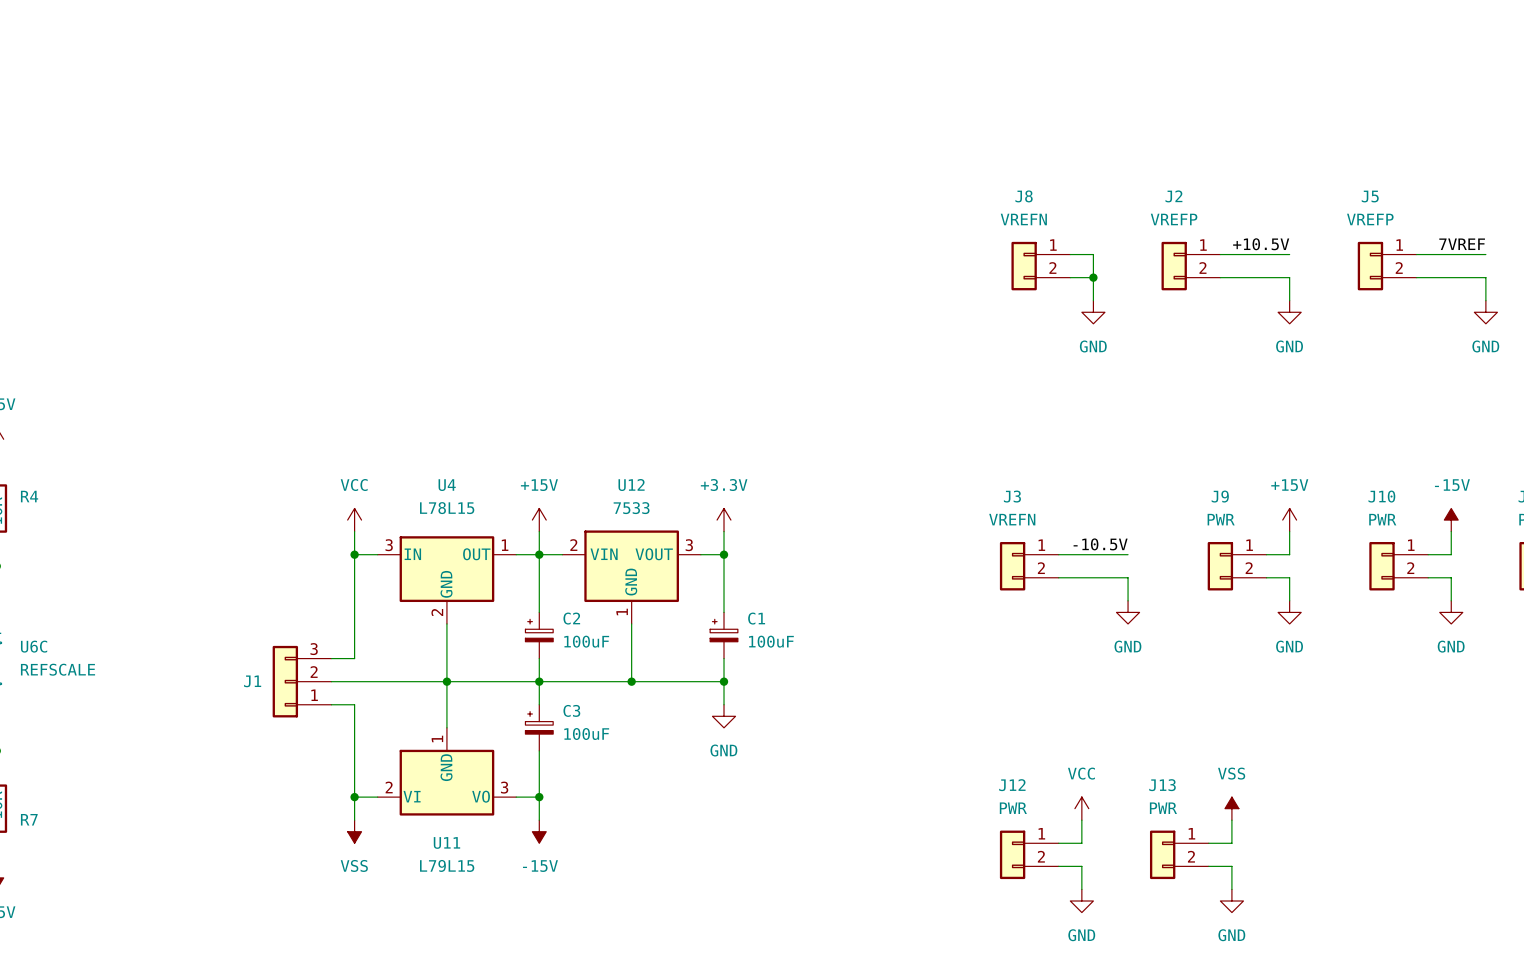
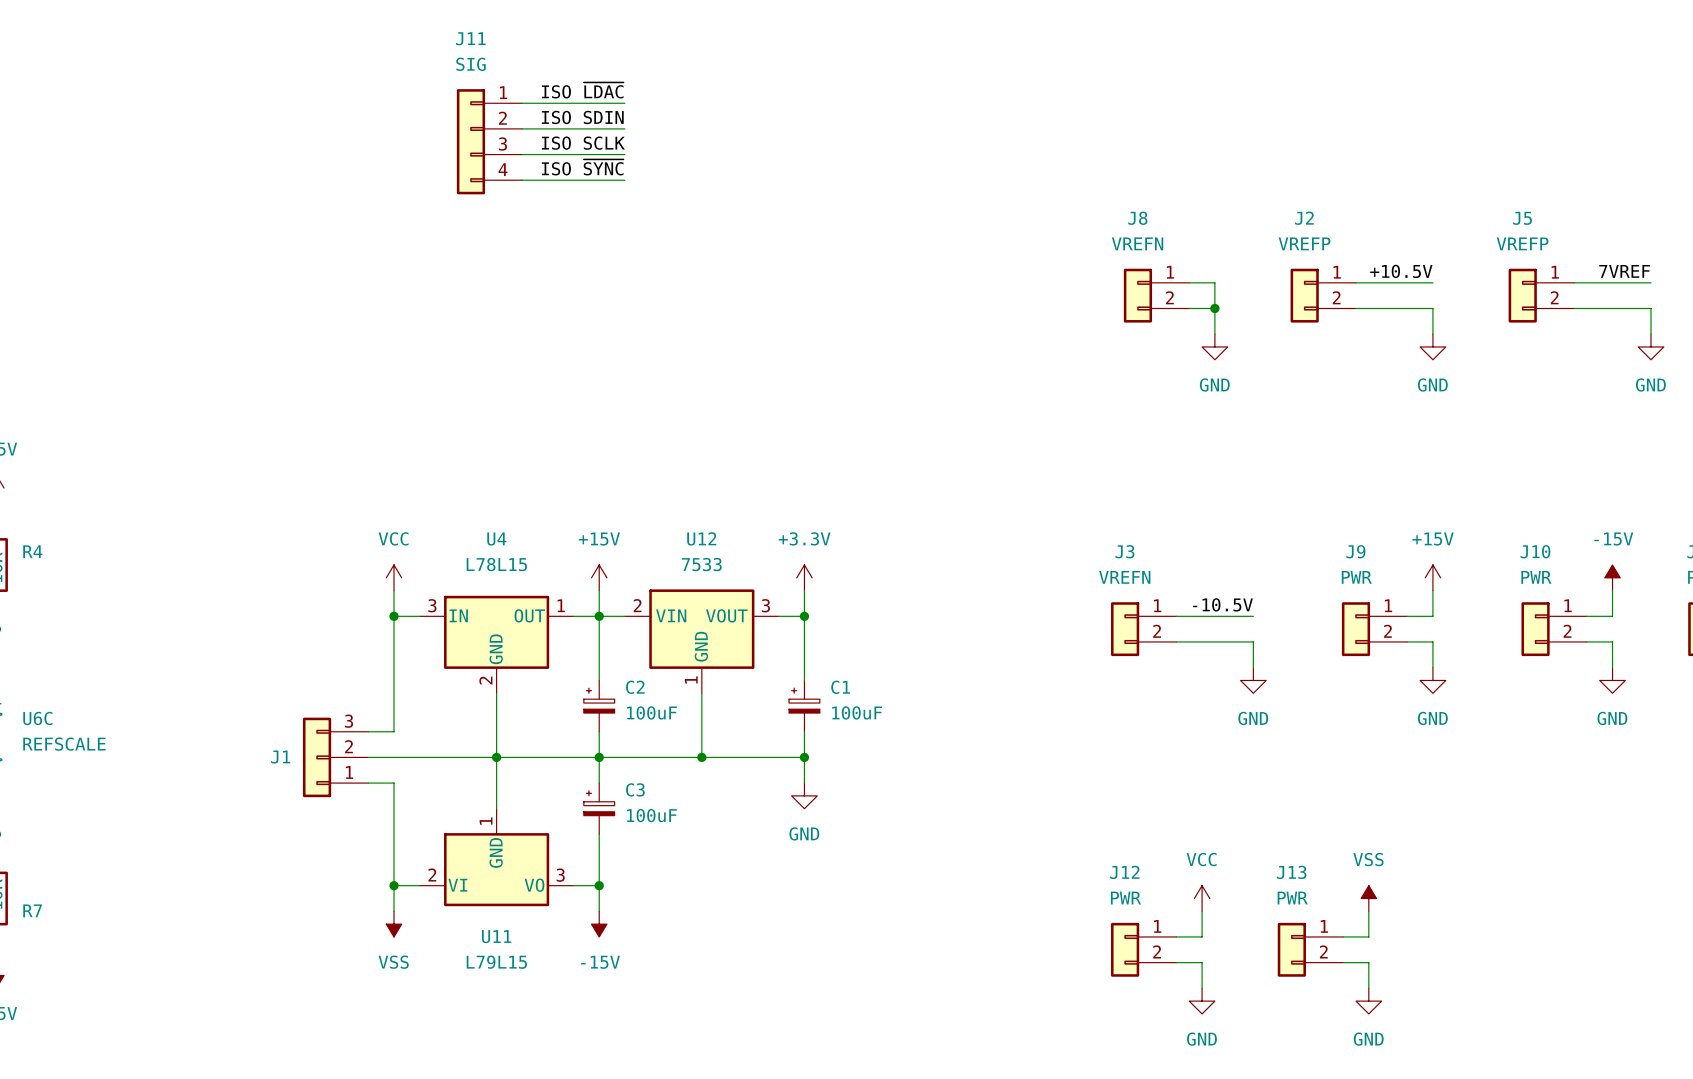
label: none -> ISO ~{LDAC} (582, 90)
wire: none -> (522, 103) (624, 103)
label: none -> ISO SDIN (582, 117)
wire: none -> (522, 128) (624, 128)
J11: none -> SIG (489, 141)
label: none -> ISO SCLK (583, 143)
wire: none -> (522, 154) (624, 154)
label: none -> ISO ~{SYNC} (582, 167)
wire: none -> (522, 180) (624, 180)

